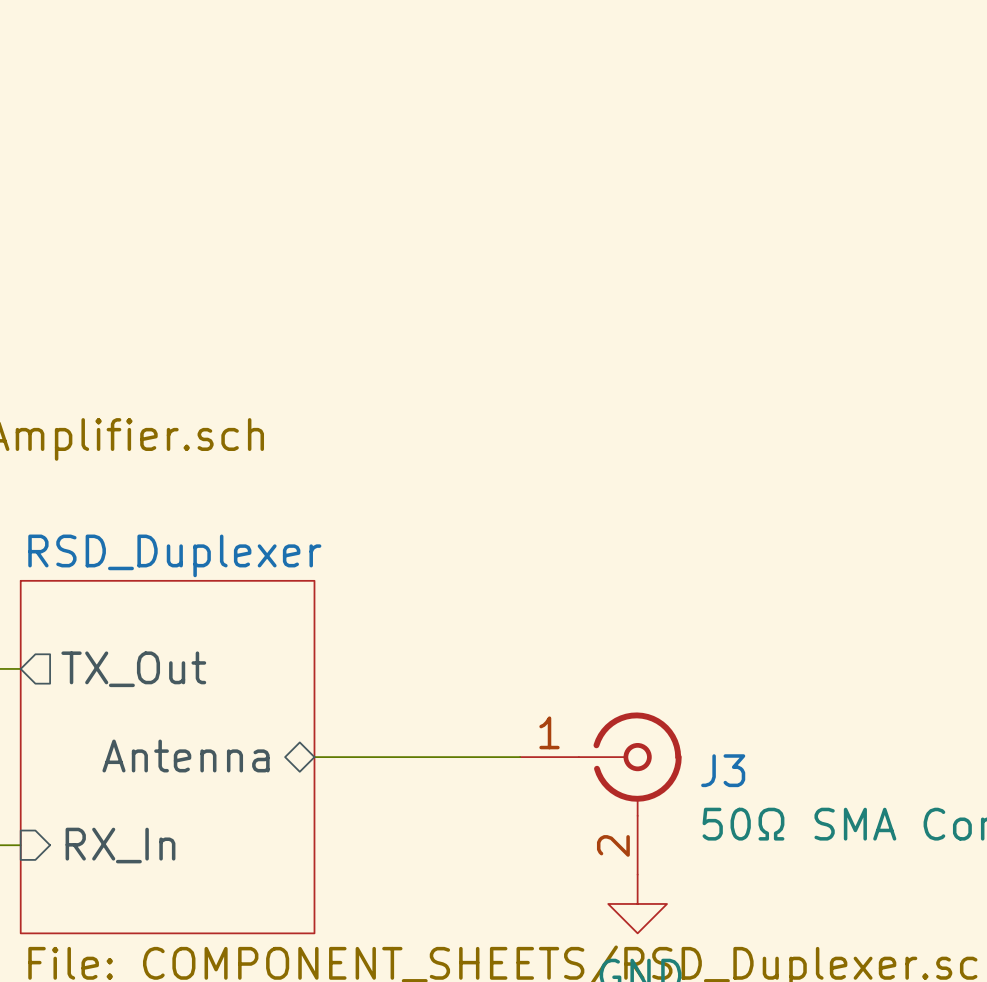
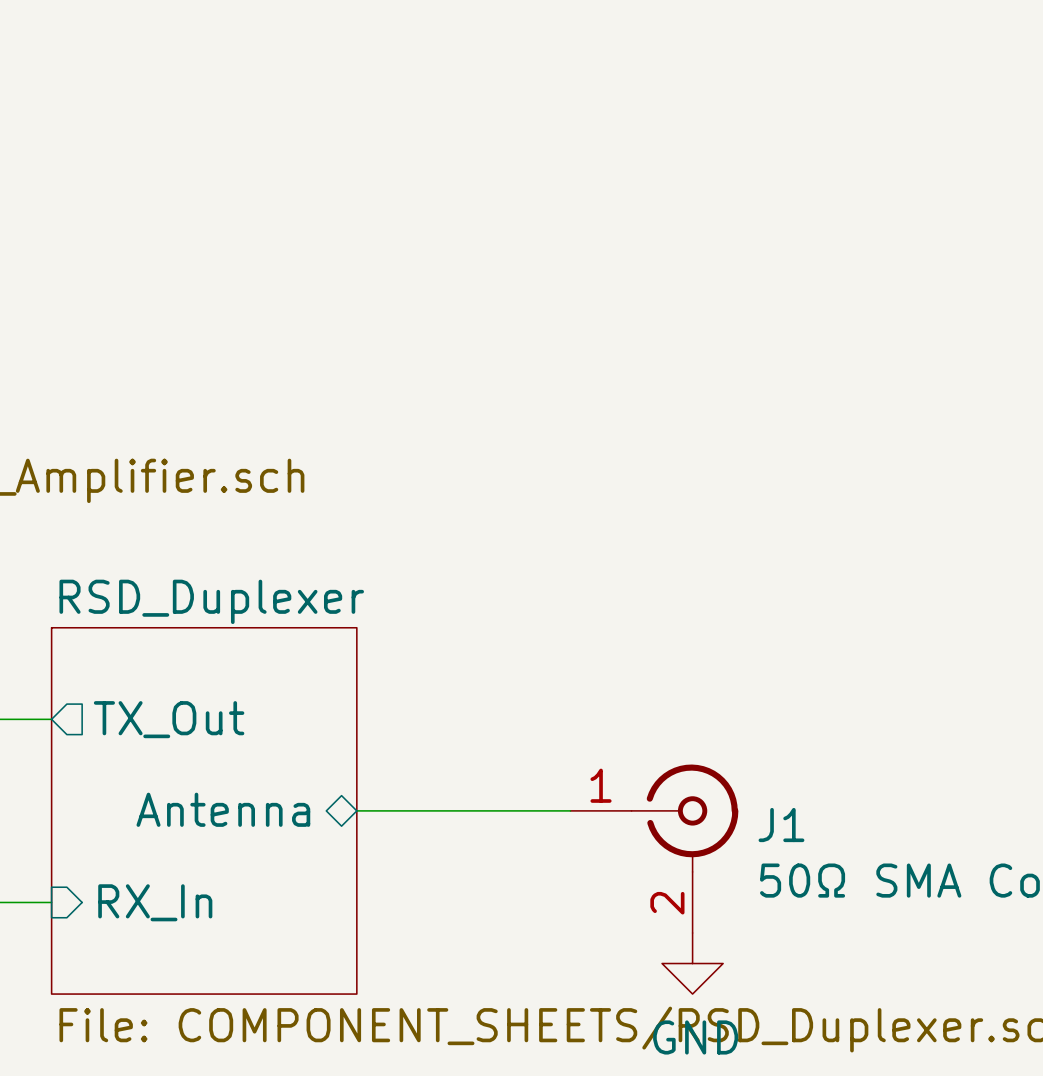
J3 name: J3 (723, 770) -> J1 (781, 825)

